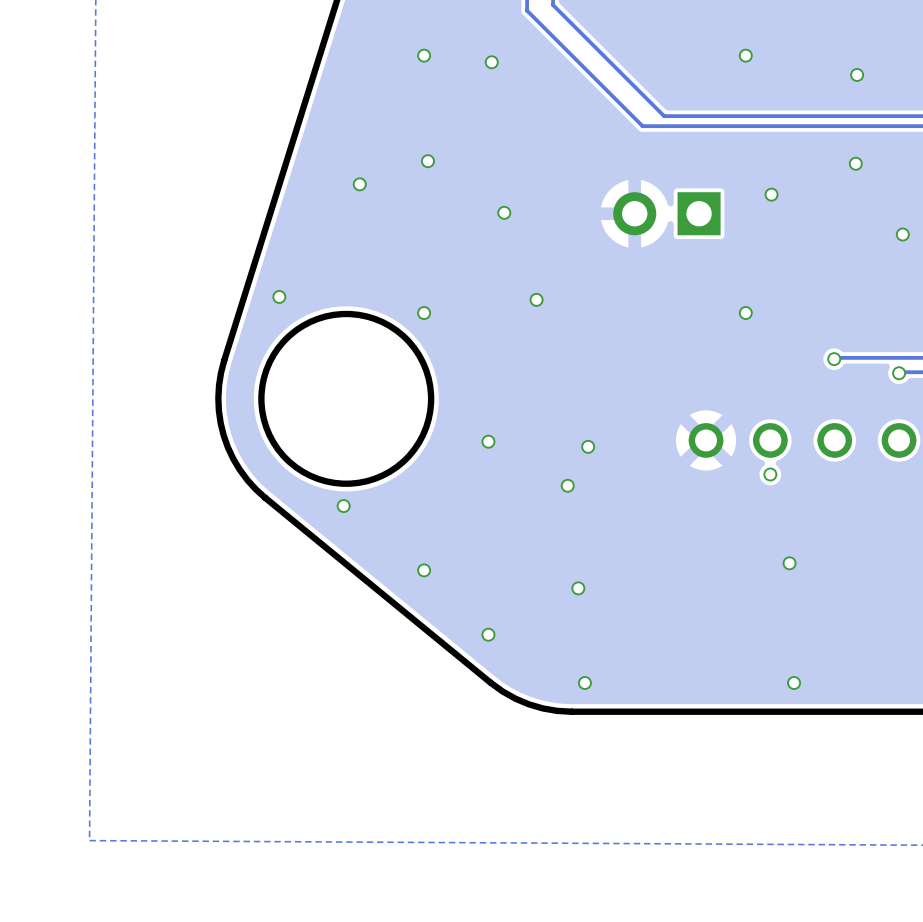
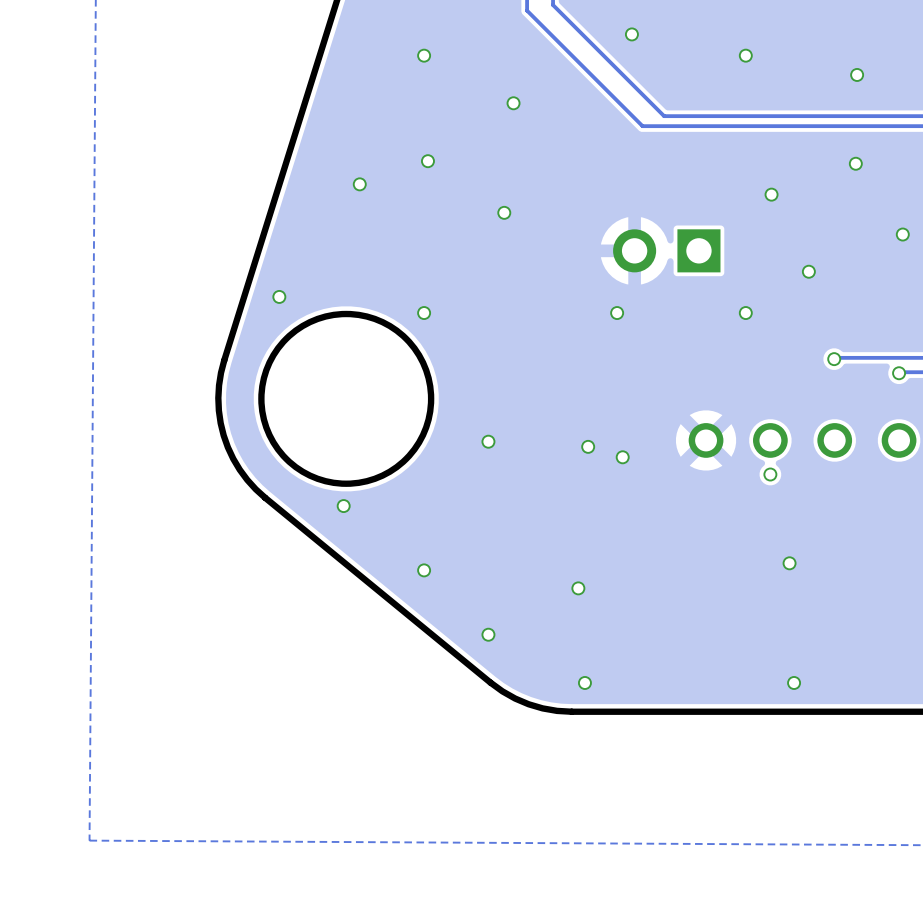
via: none -> (631, 34)
via position: (491, 62) -> (513, 103)
part position: (666, 213) -> (666, 250)
via: none -> (808, 271)
via position: (536, 299) -> (617, 313)
via position: (567, 485) -> (622, 457)

